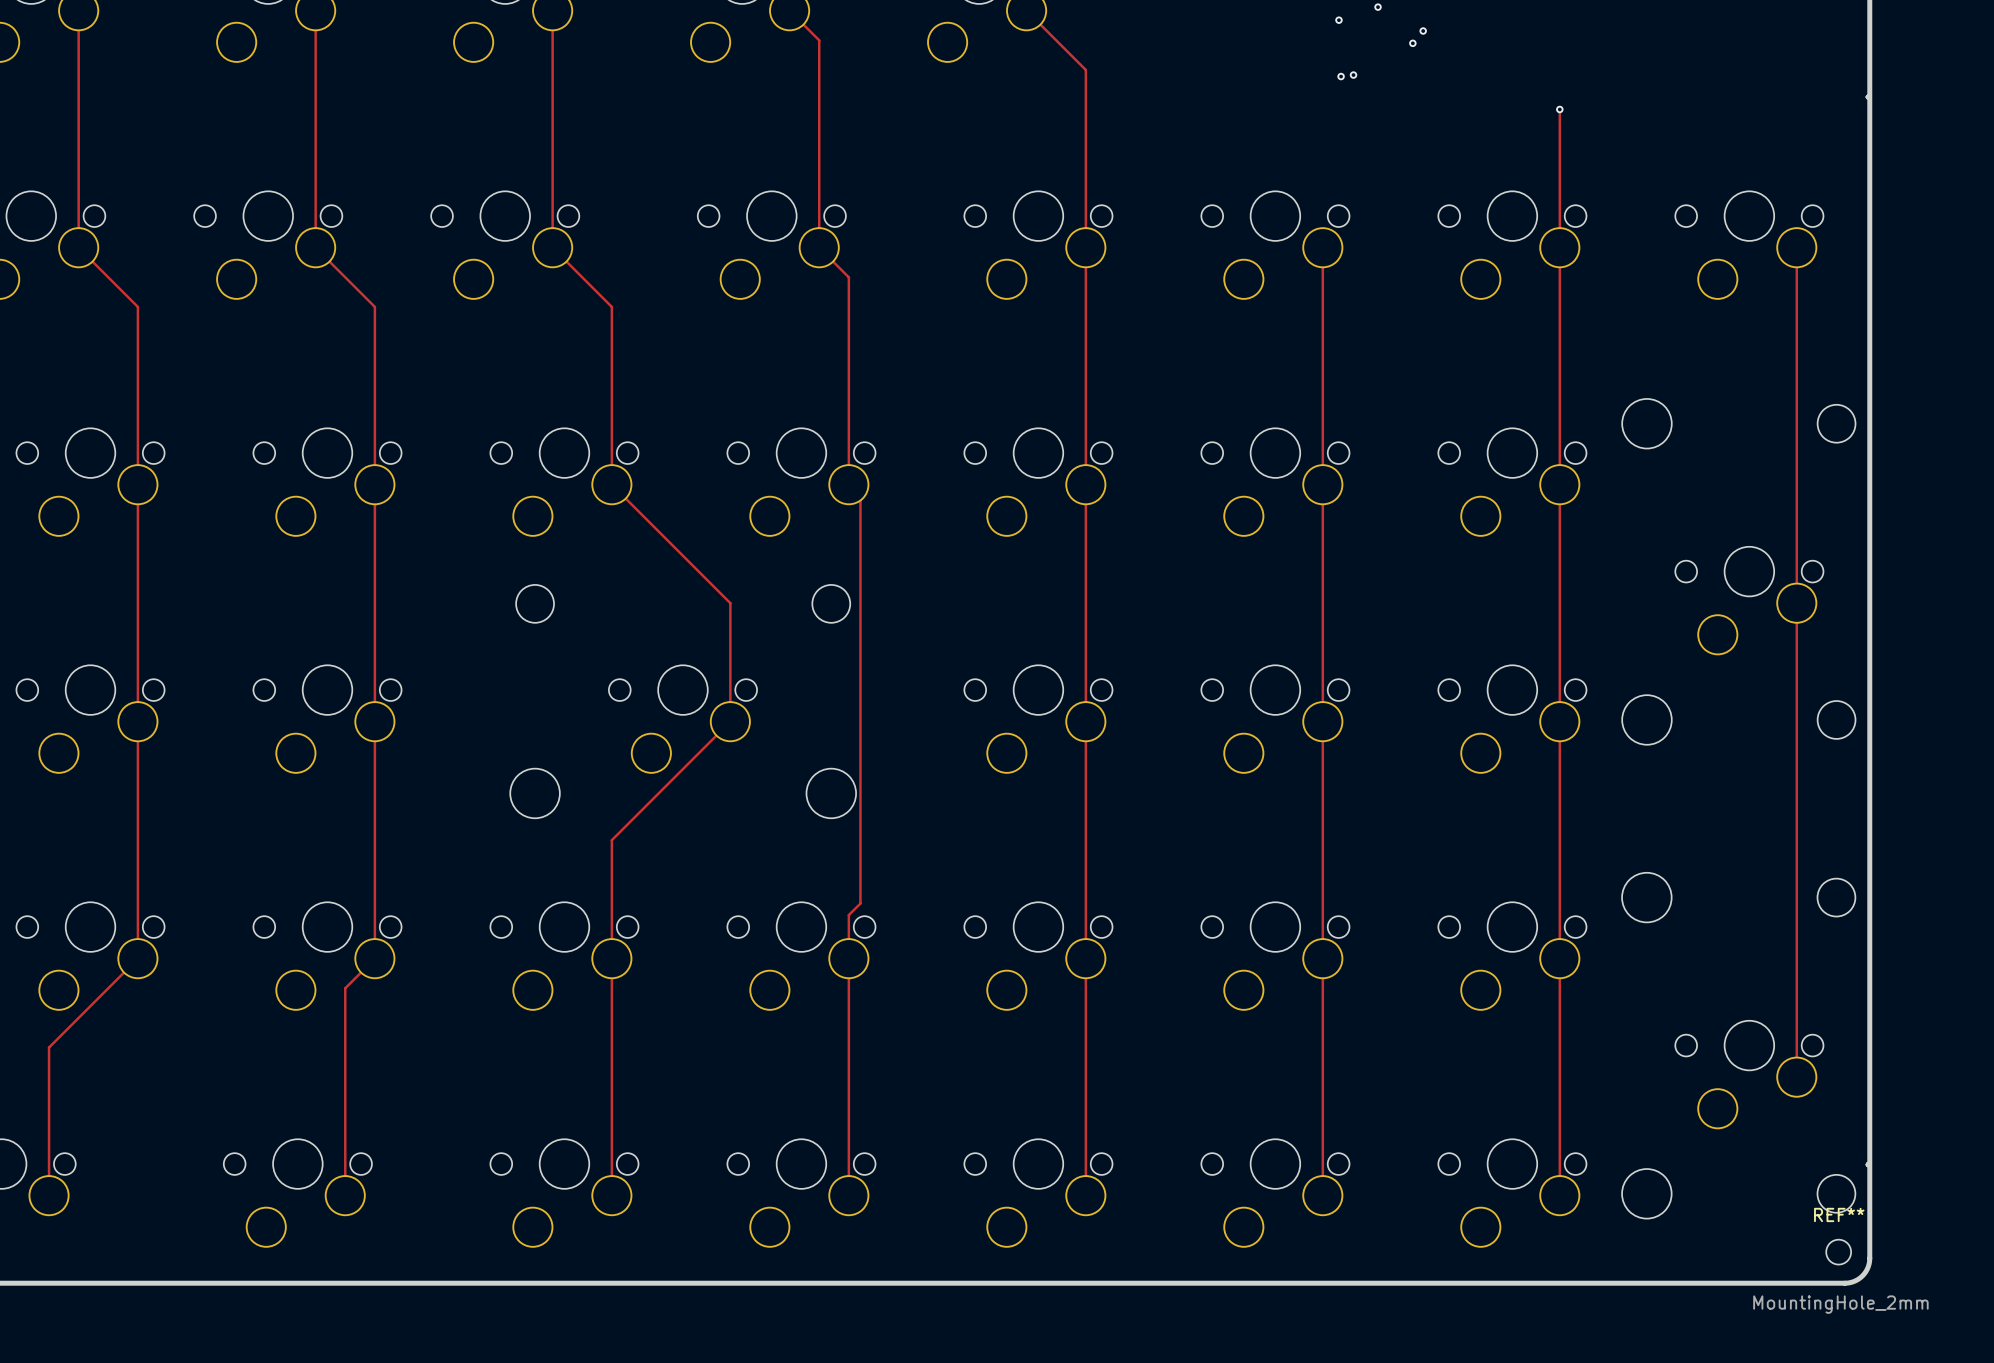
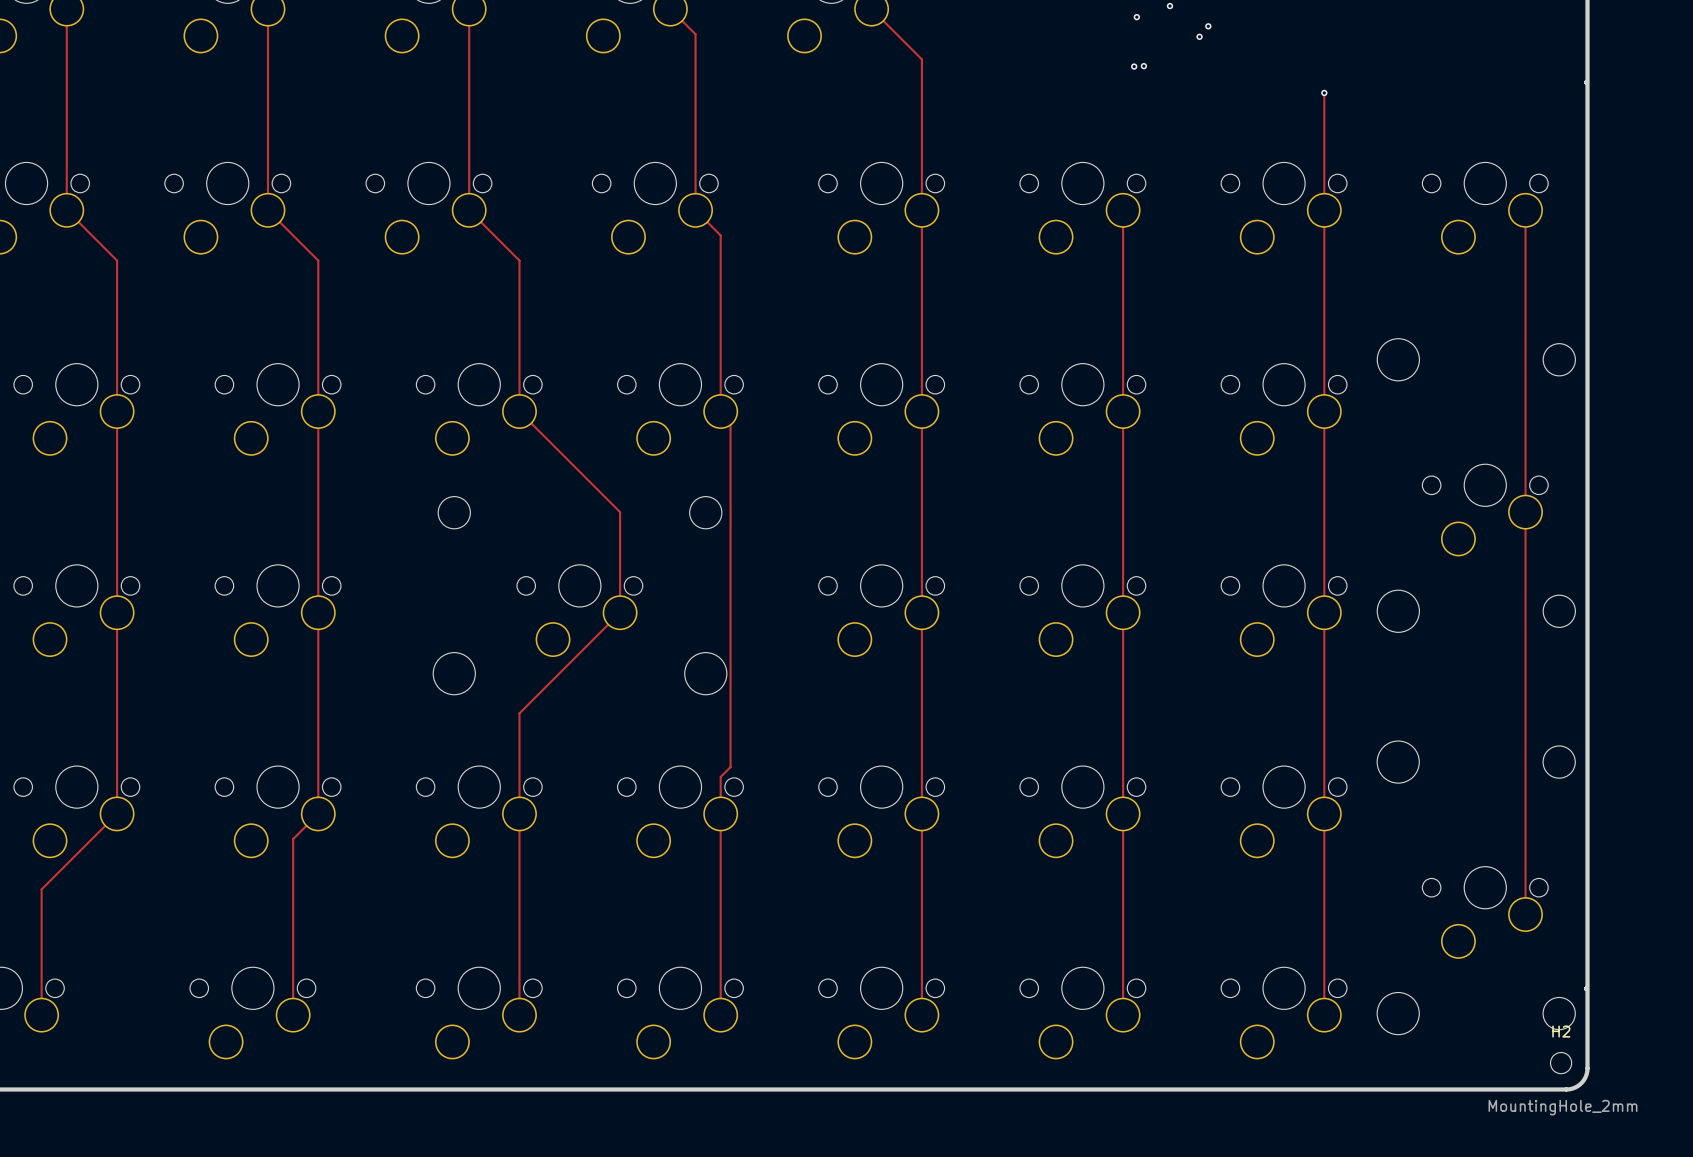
via: (1353, 75) -> none
via: (1341, 76) -> none
via: none -> (1143, 66)
via: none -> (1134, 66)
REF** name: REF** (1839, 1214) -> H2 (1561, 1031)

